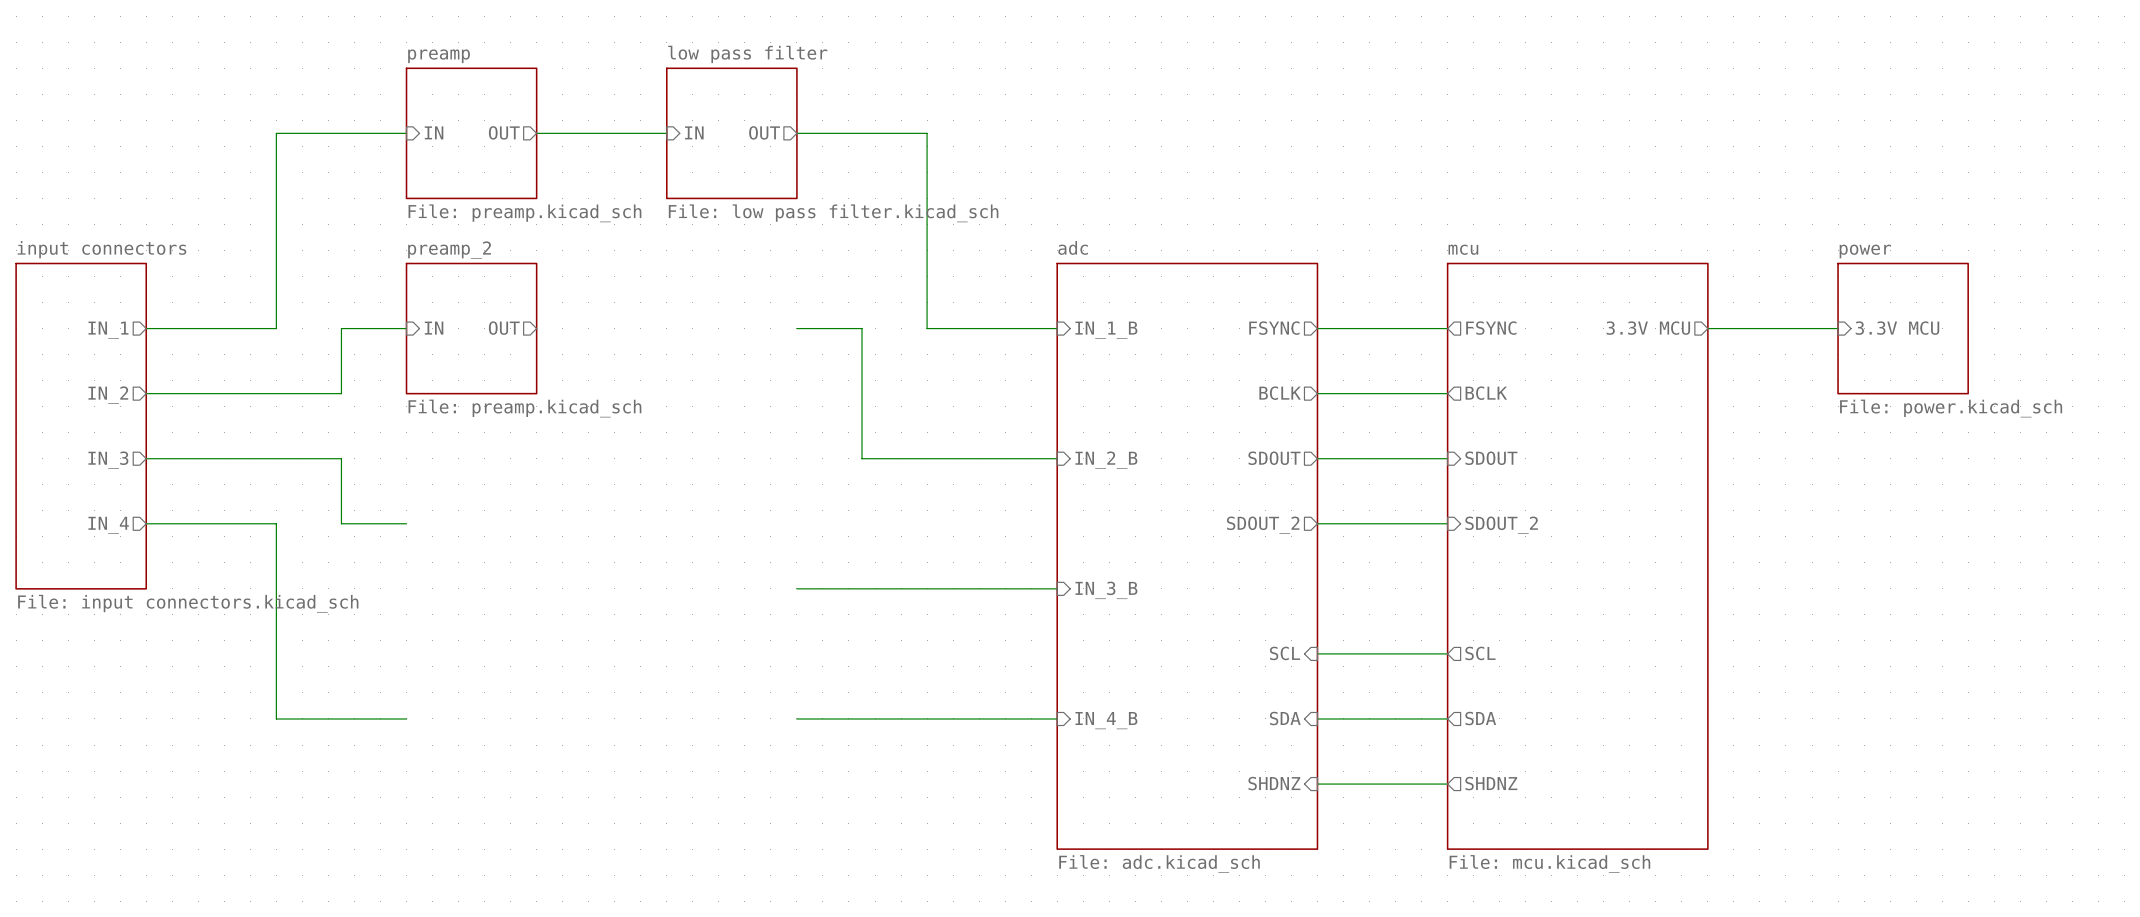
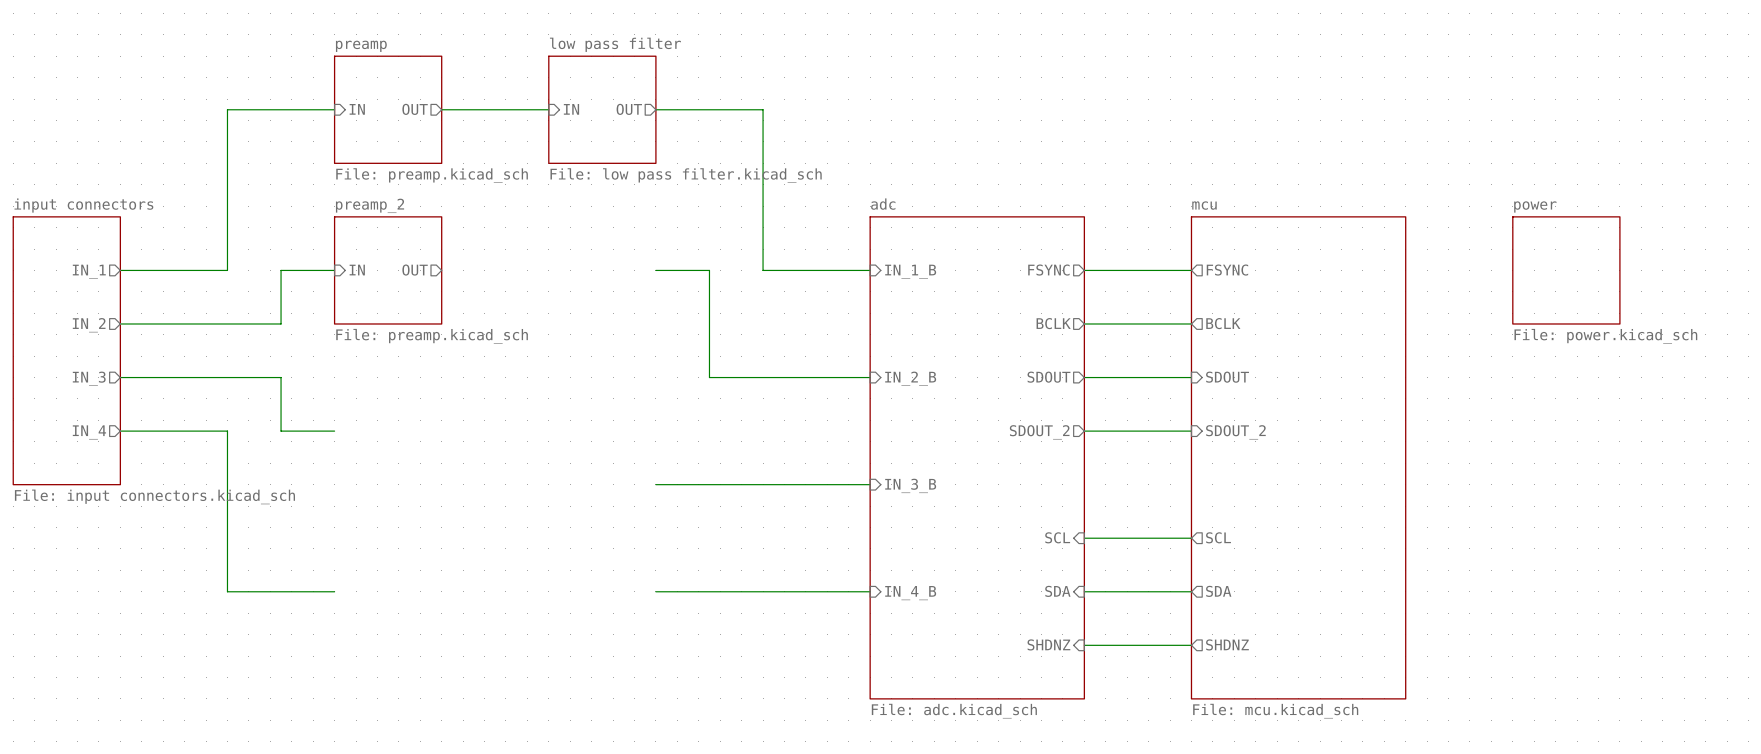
sheet pin: 3.3V MCU (1648, 328) -> none
wire: (1707, 328) (1838, 328) -> none
sheet pin: 3.3V MCU (1897, 328) -> none

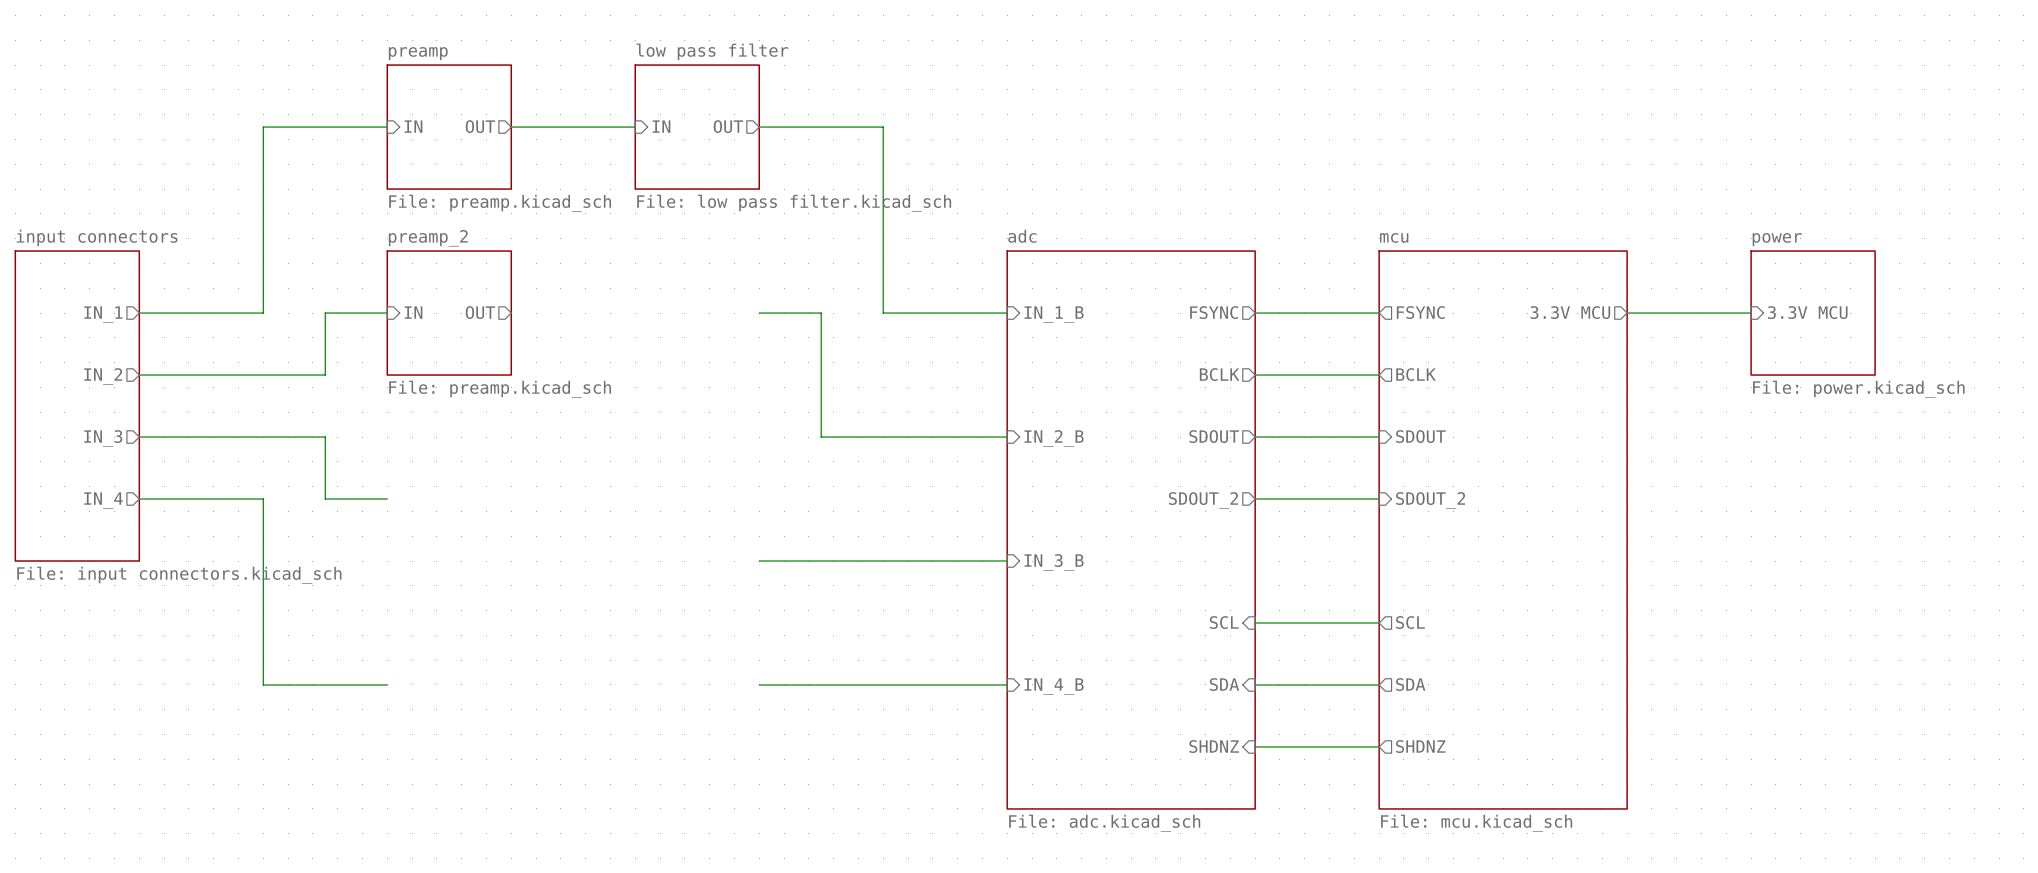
sheet pin: none -> 3.3V MCU (1570, 312)
wire: none -> (1627, 313) (1751, 313)
sheet pin: none -> 3.3V MCU (1807, 312)

